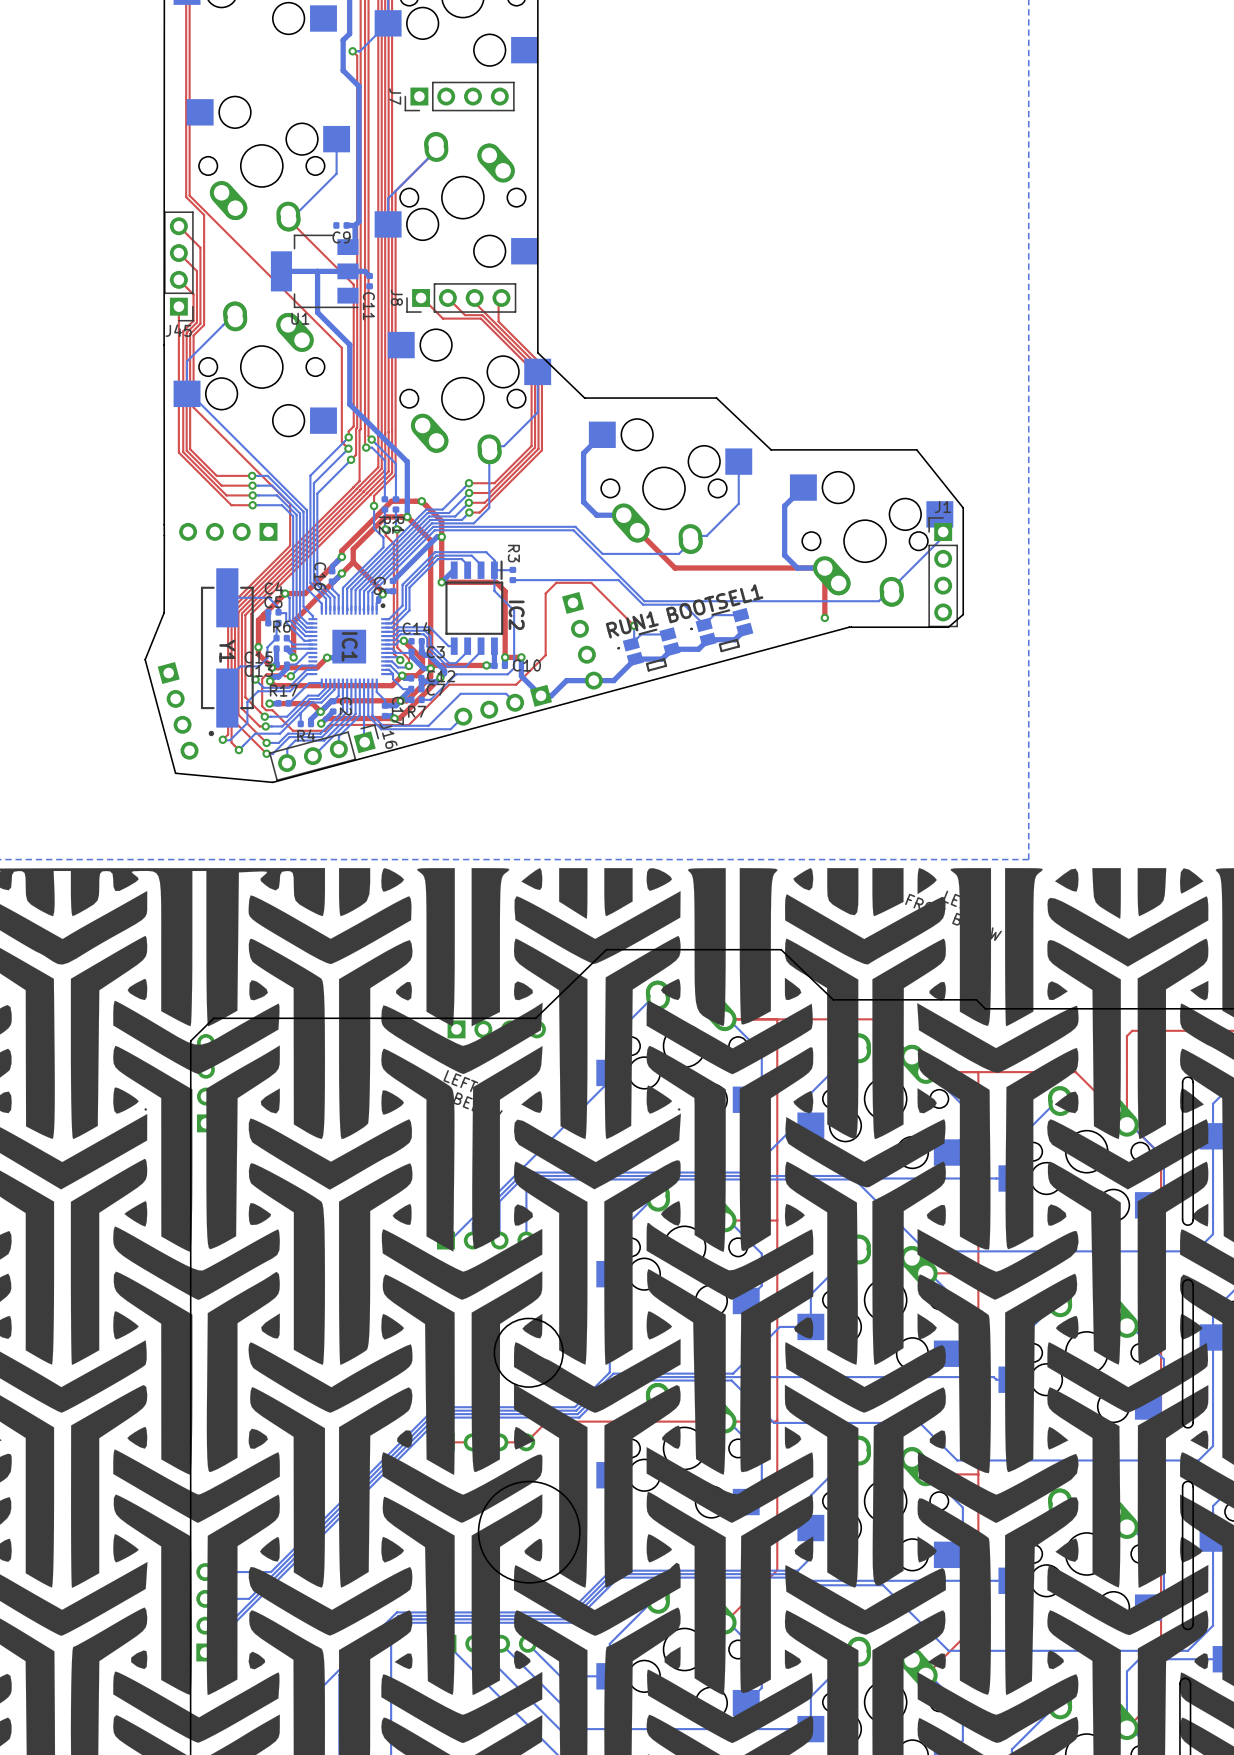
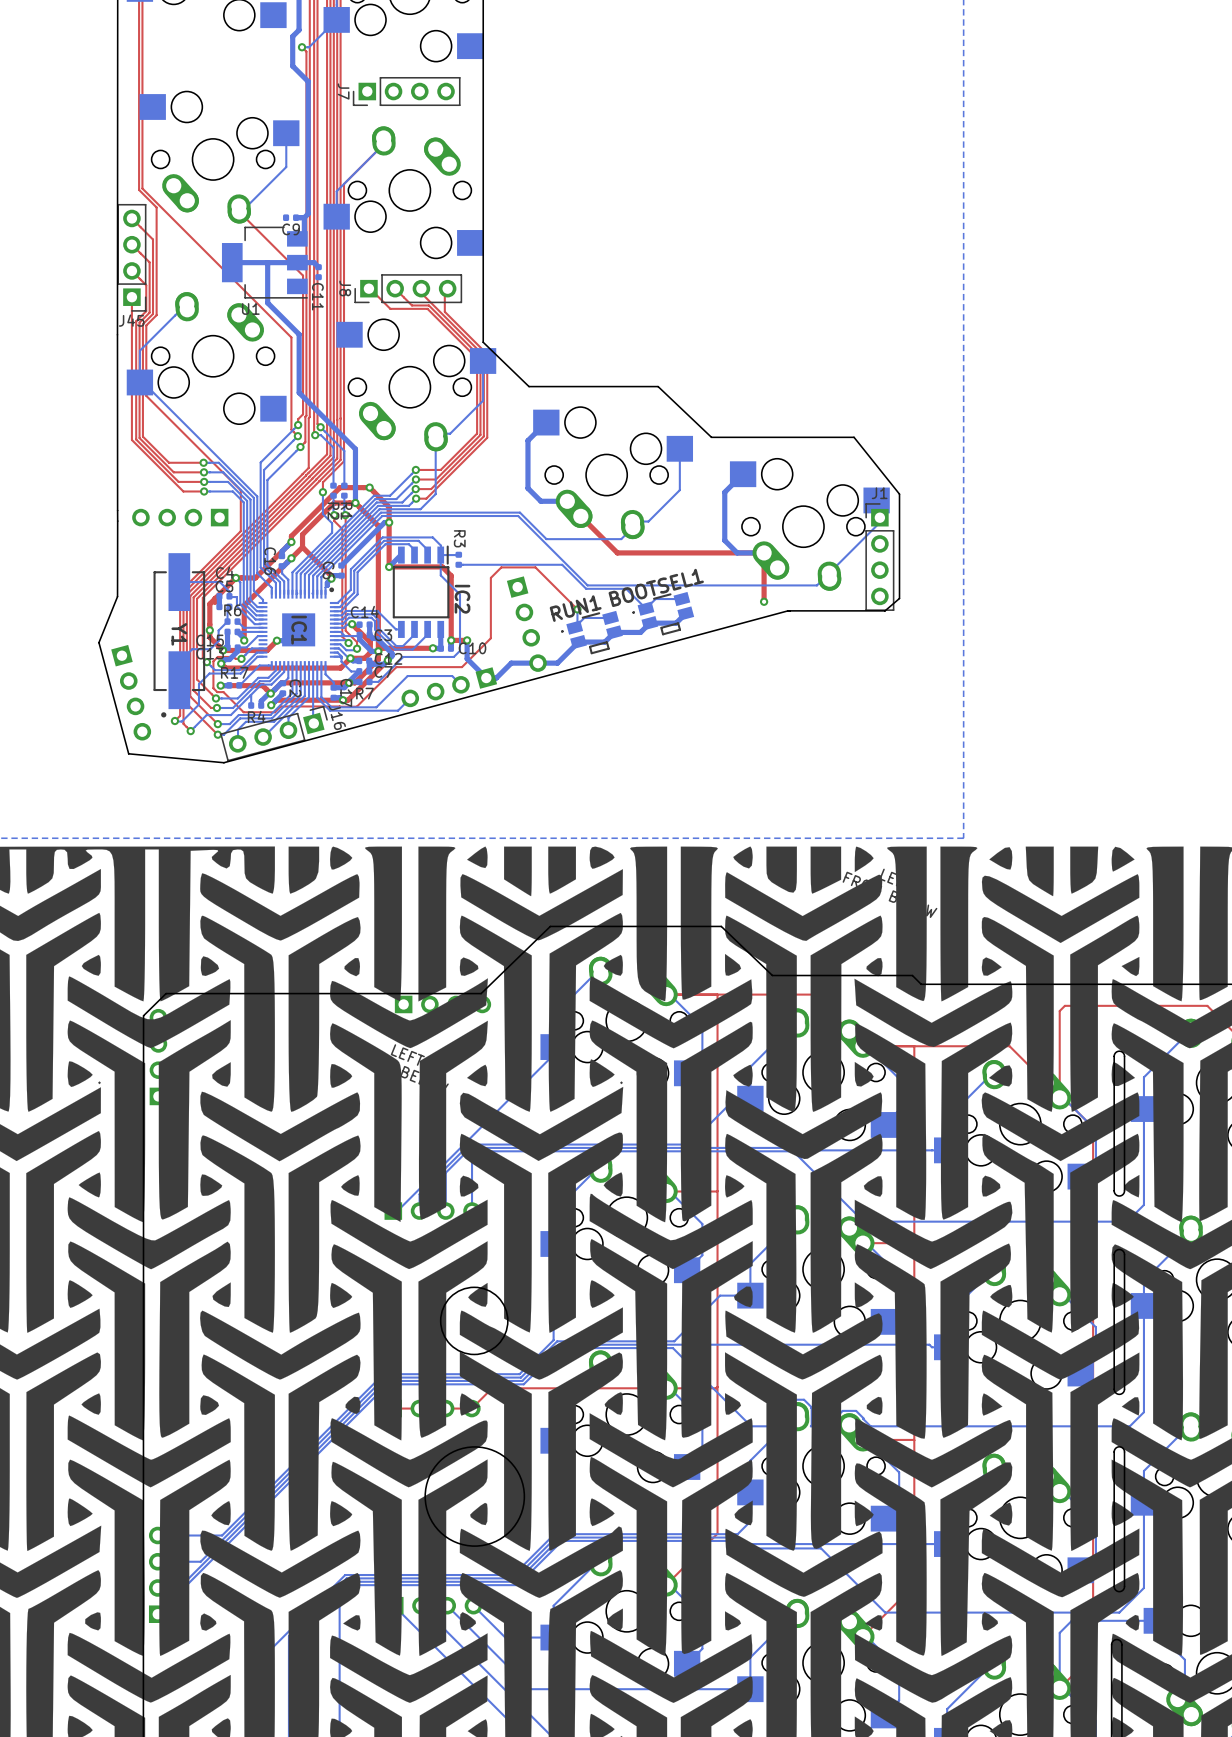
bottom track: (774, 1422) (919, 1422) (957, 1460) -> (714, 1389) (751, 1426) (779, 1426) (783, 1422) (783, 1406) (790, 1399) (804, 1399) (811, 1406) (810, 1426) (835, 1426) (835, 1418) (842, 1410) (856, 1410) (870, 1426) (893, 1426)

